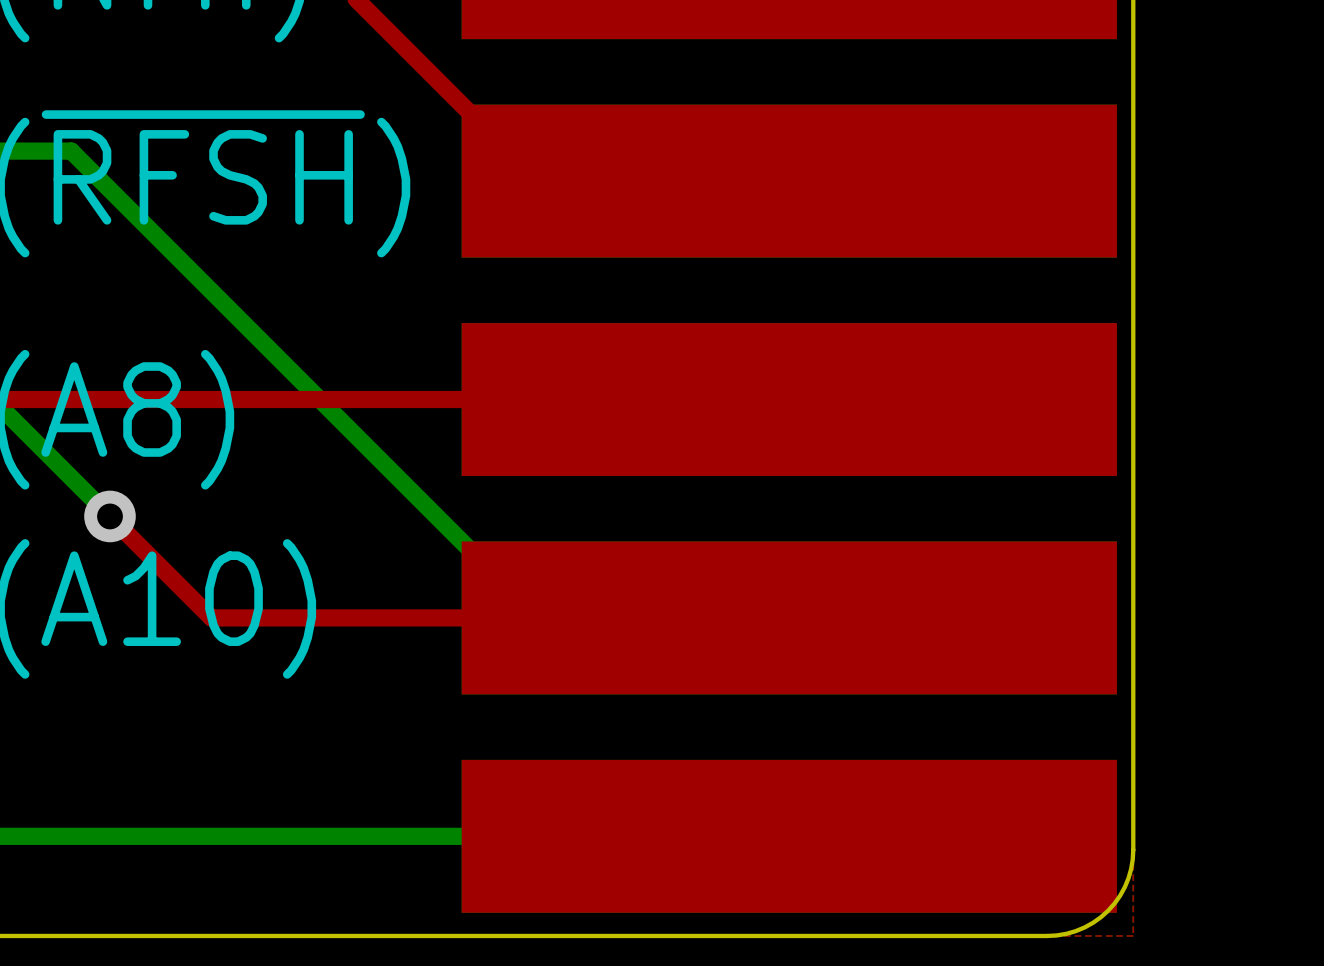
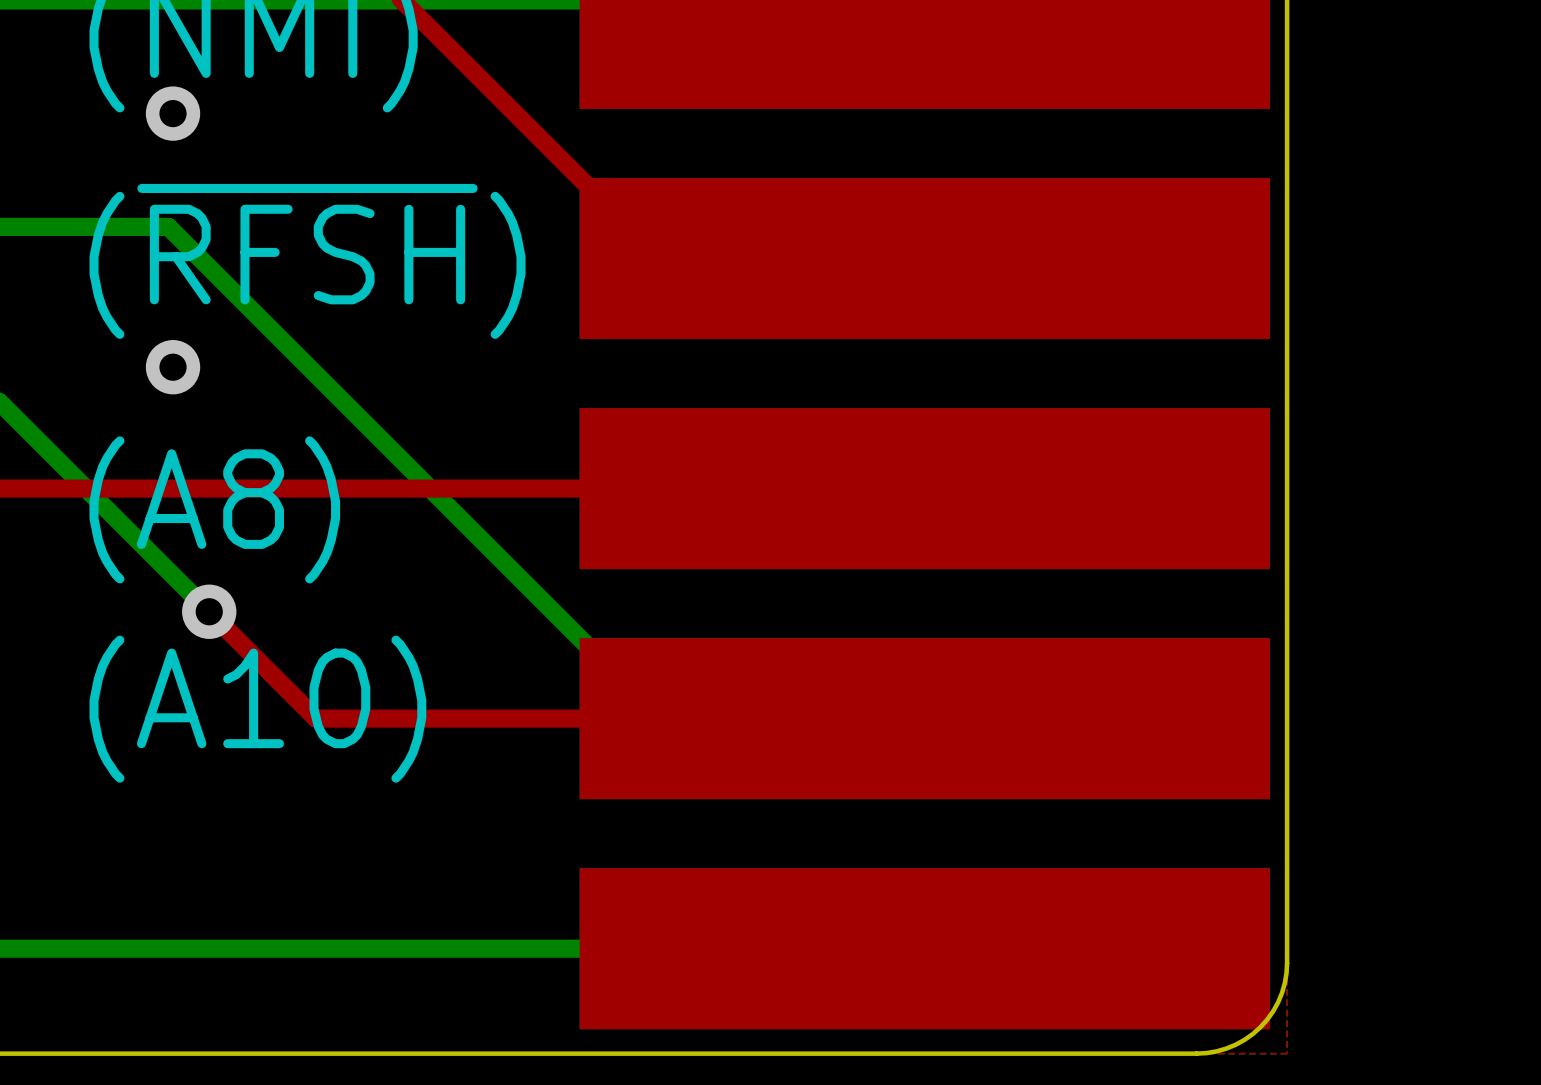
via: none -> (173, 113)
via: none -> (173, 367)

